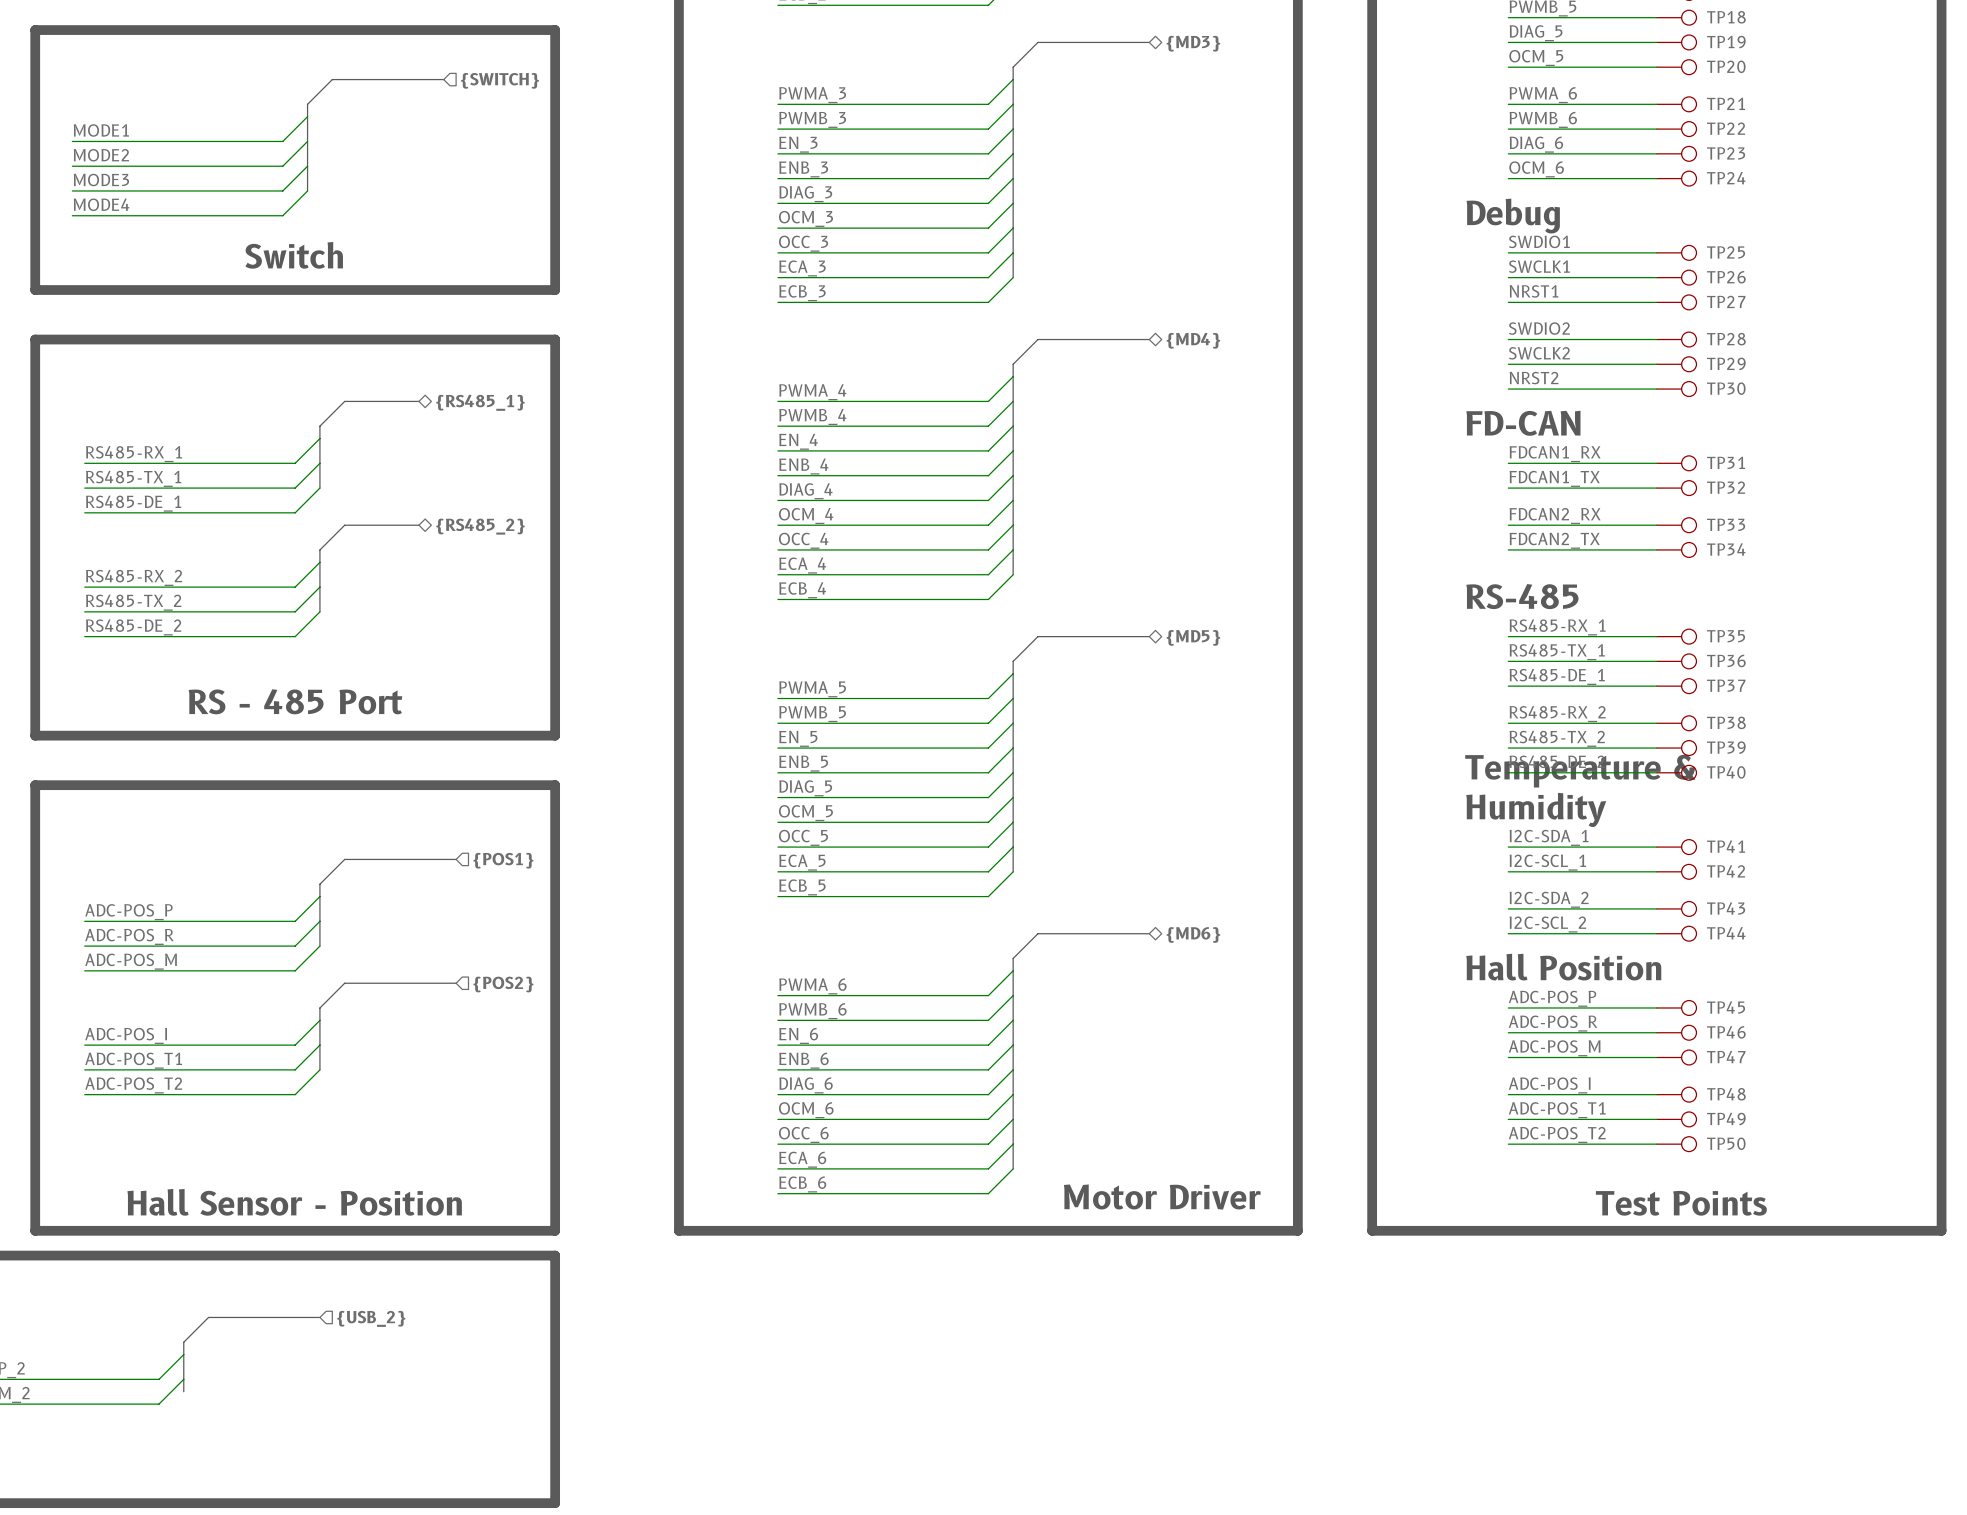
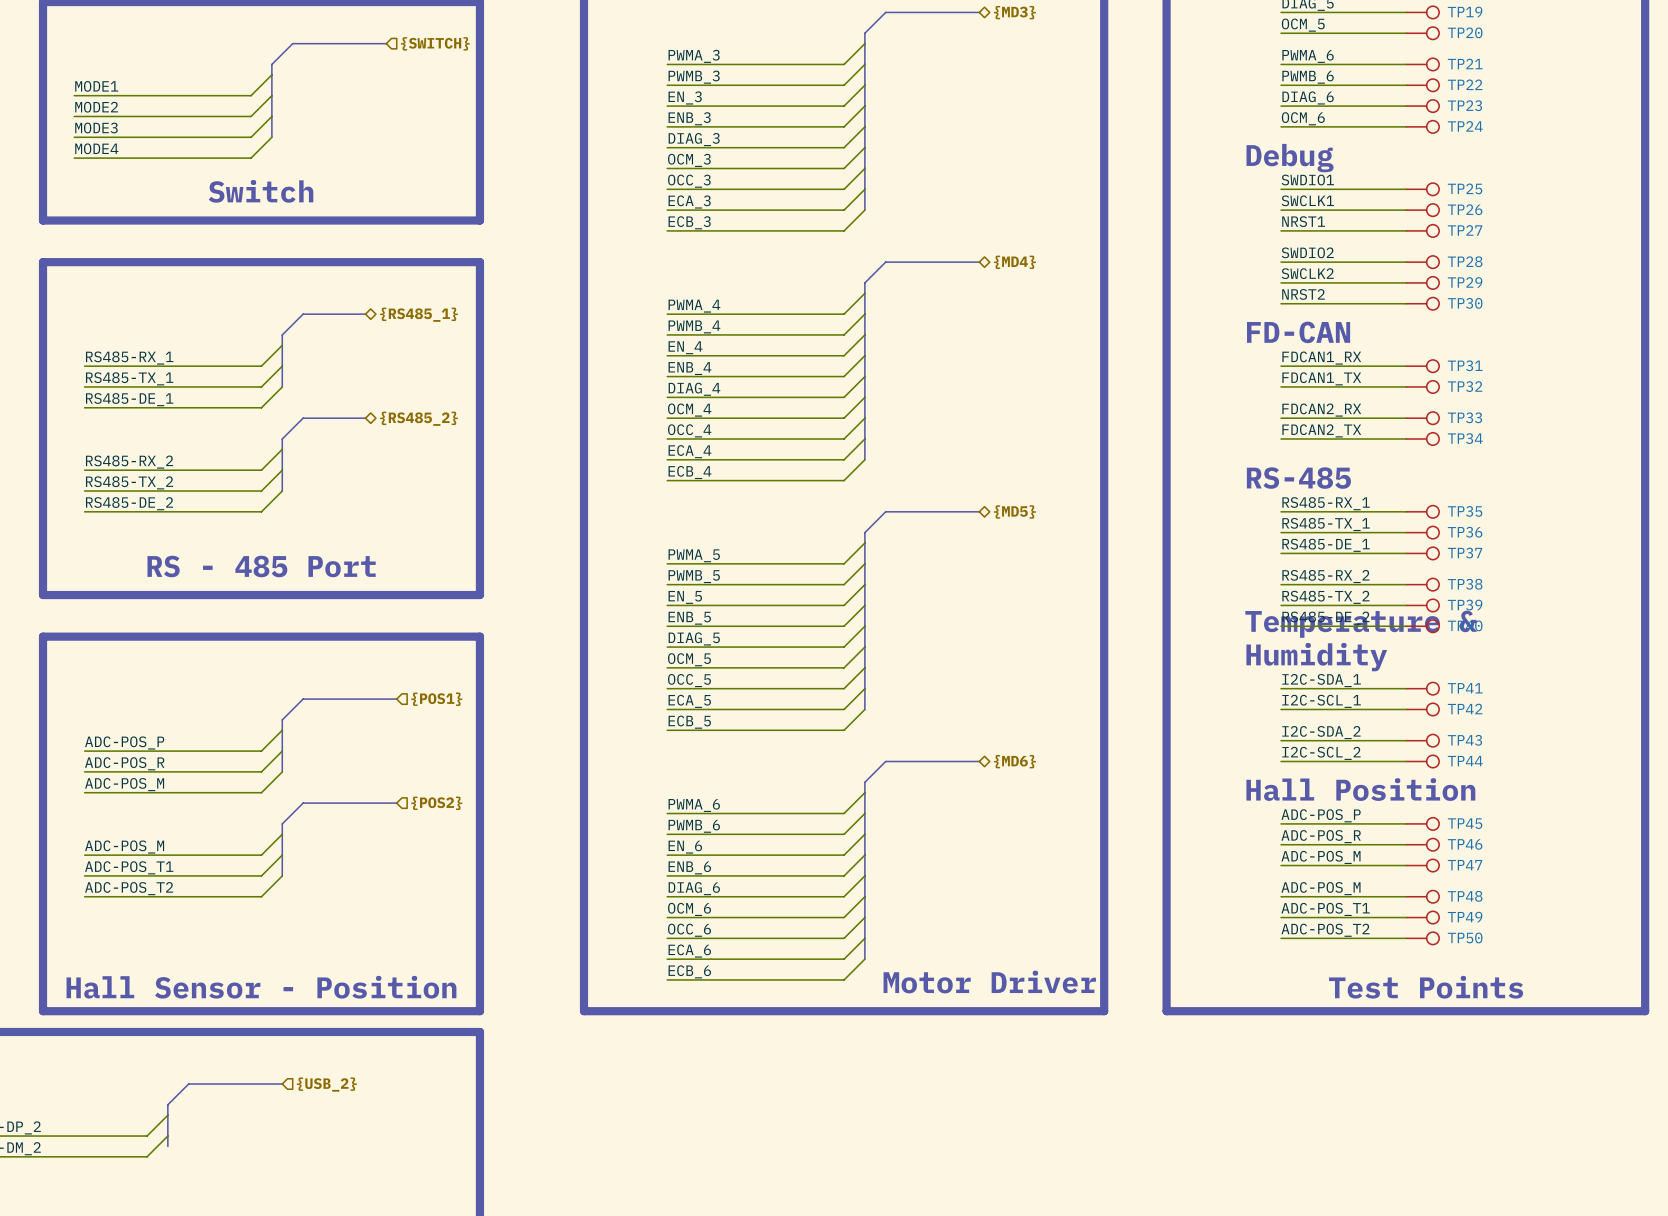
label: ADC-POS_I (126, 1035) -> ADC-POS_M (124, 847)
label: ADC-POS_I (1549, 1085) -> ADC-POS_M (1321, 888)

